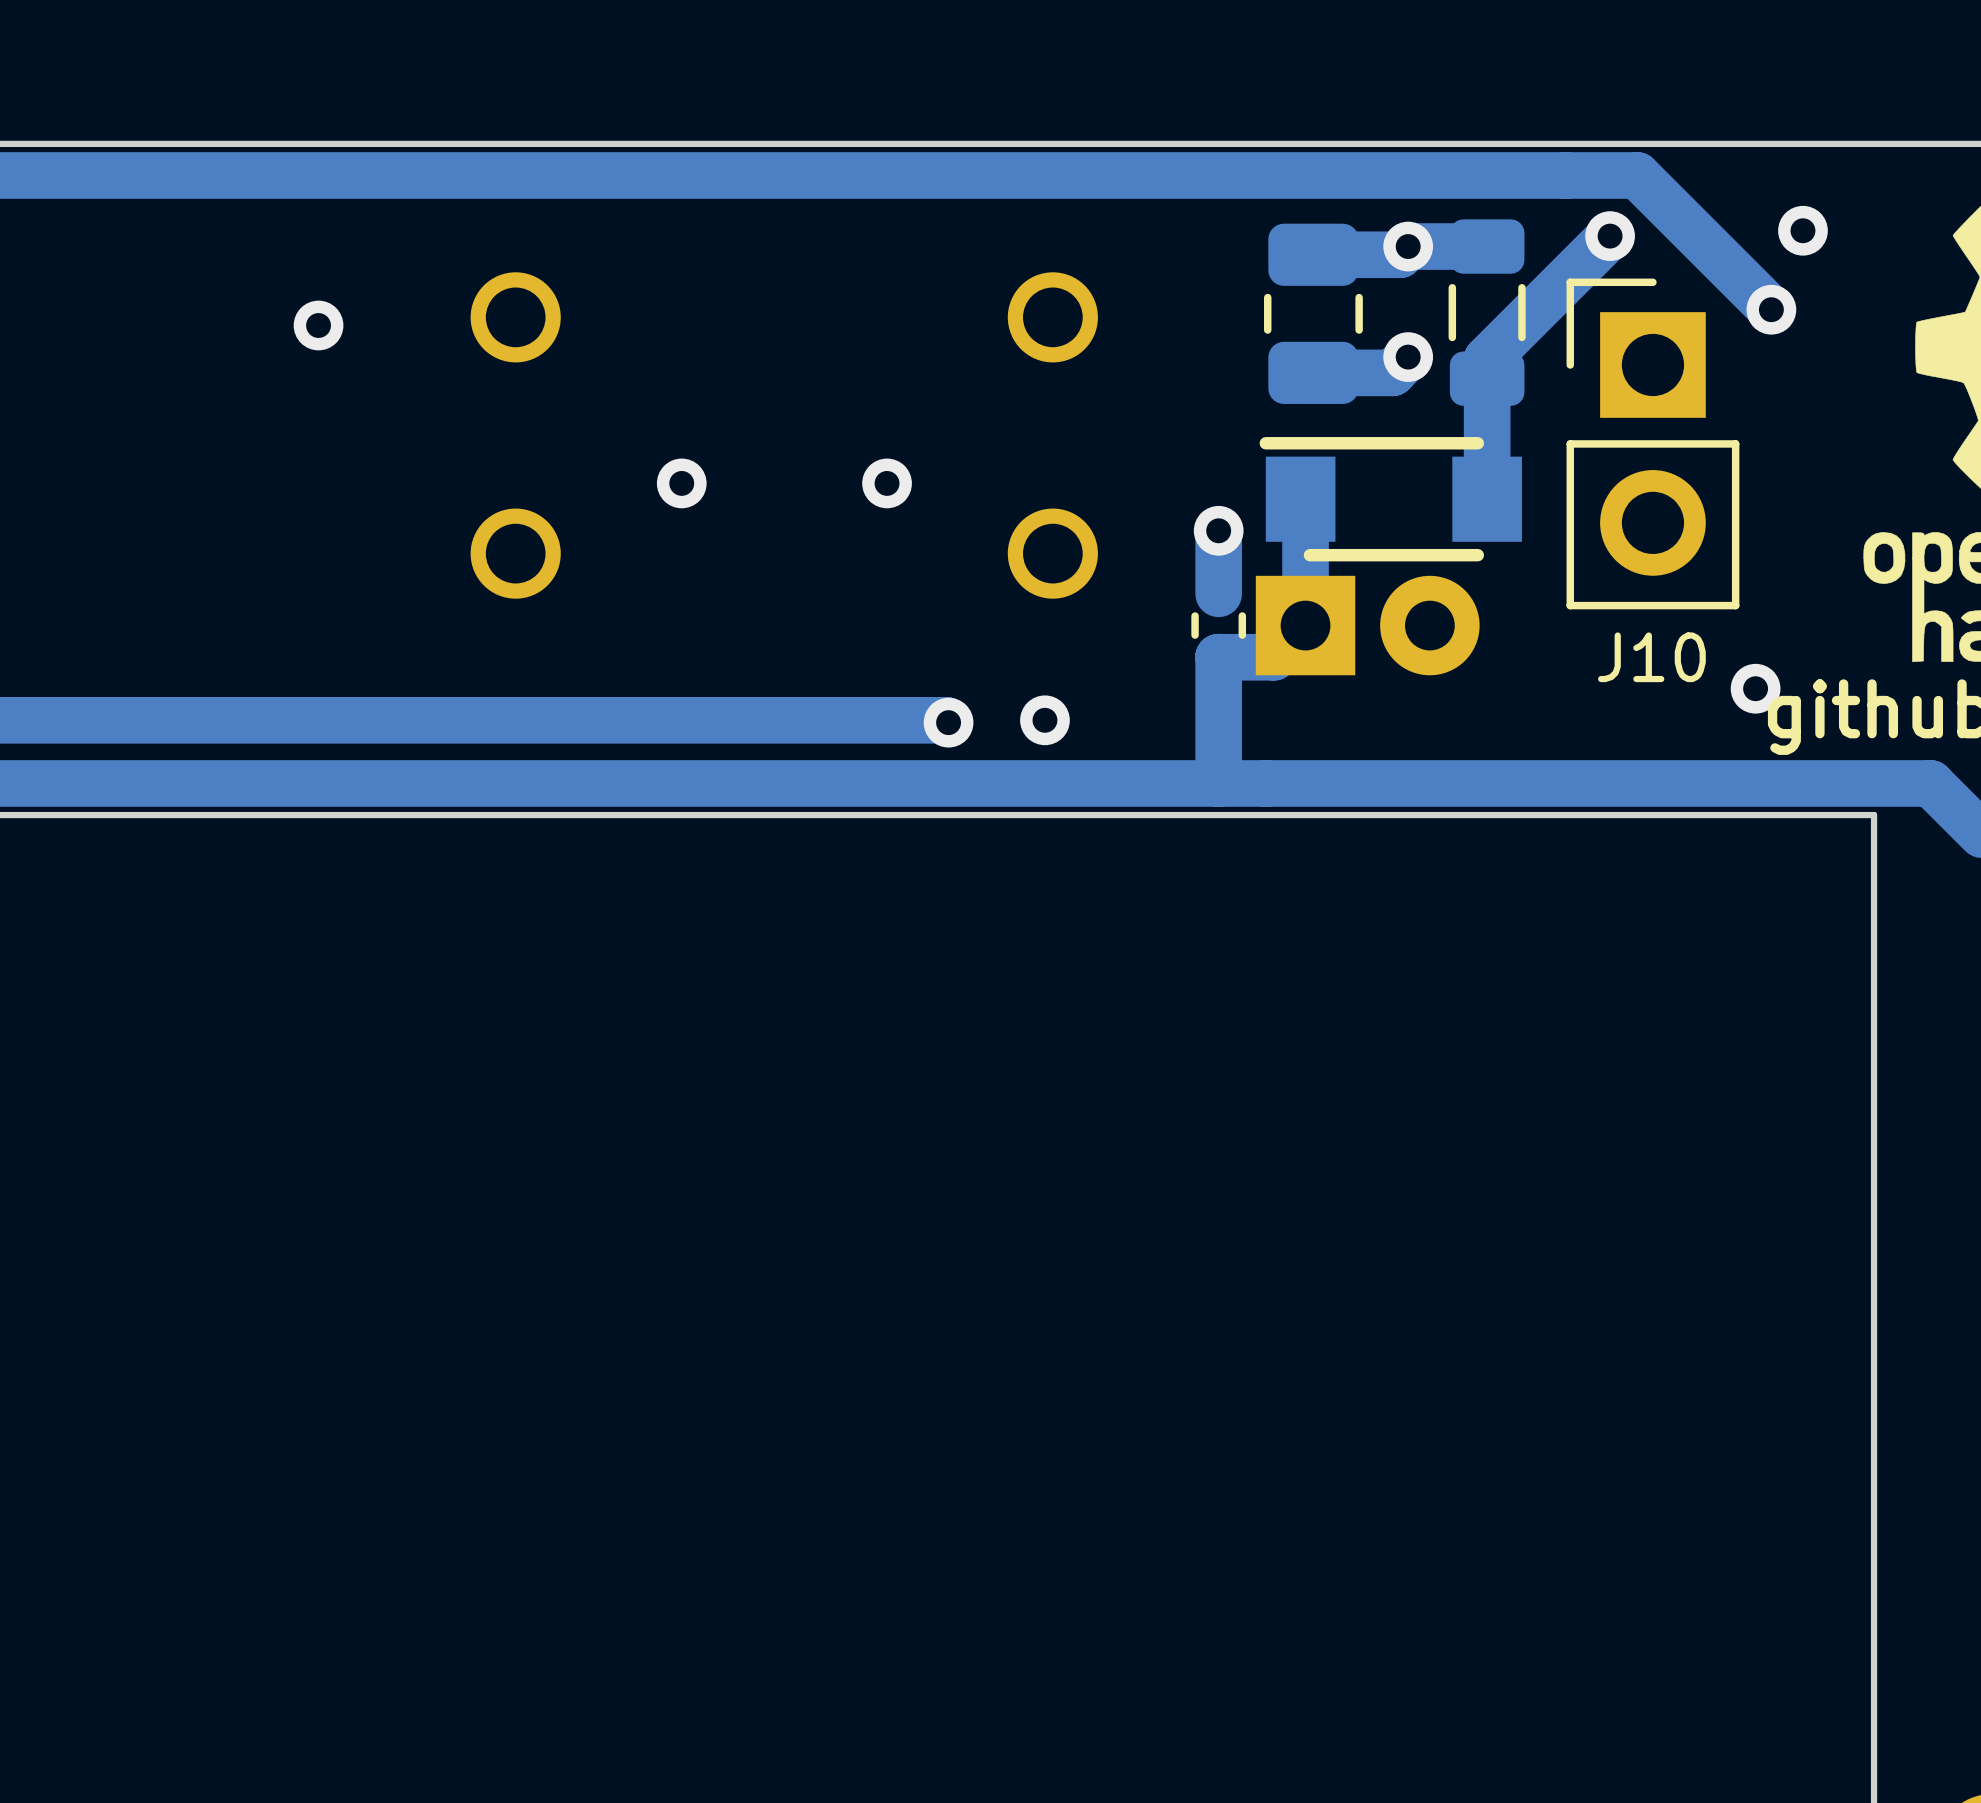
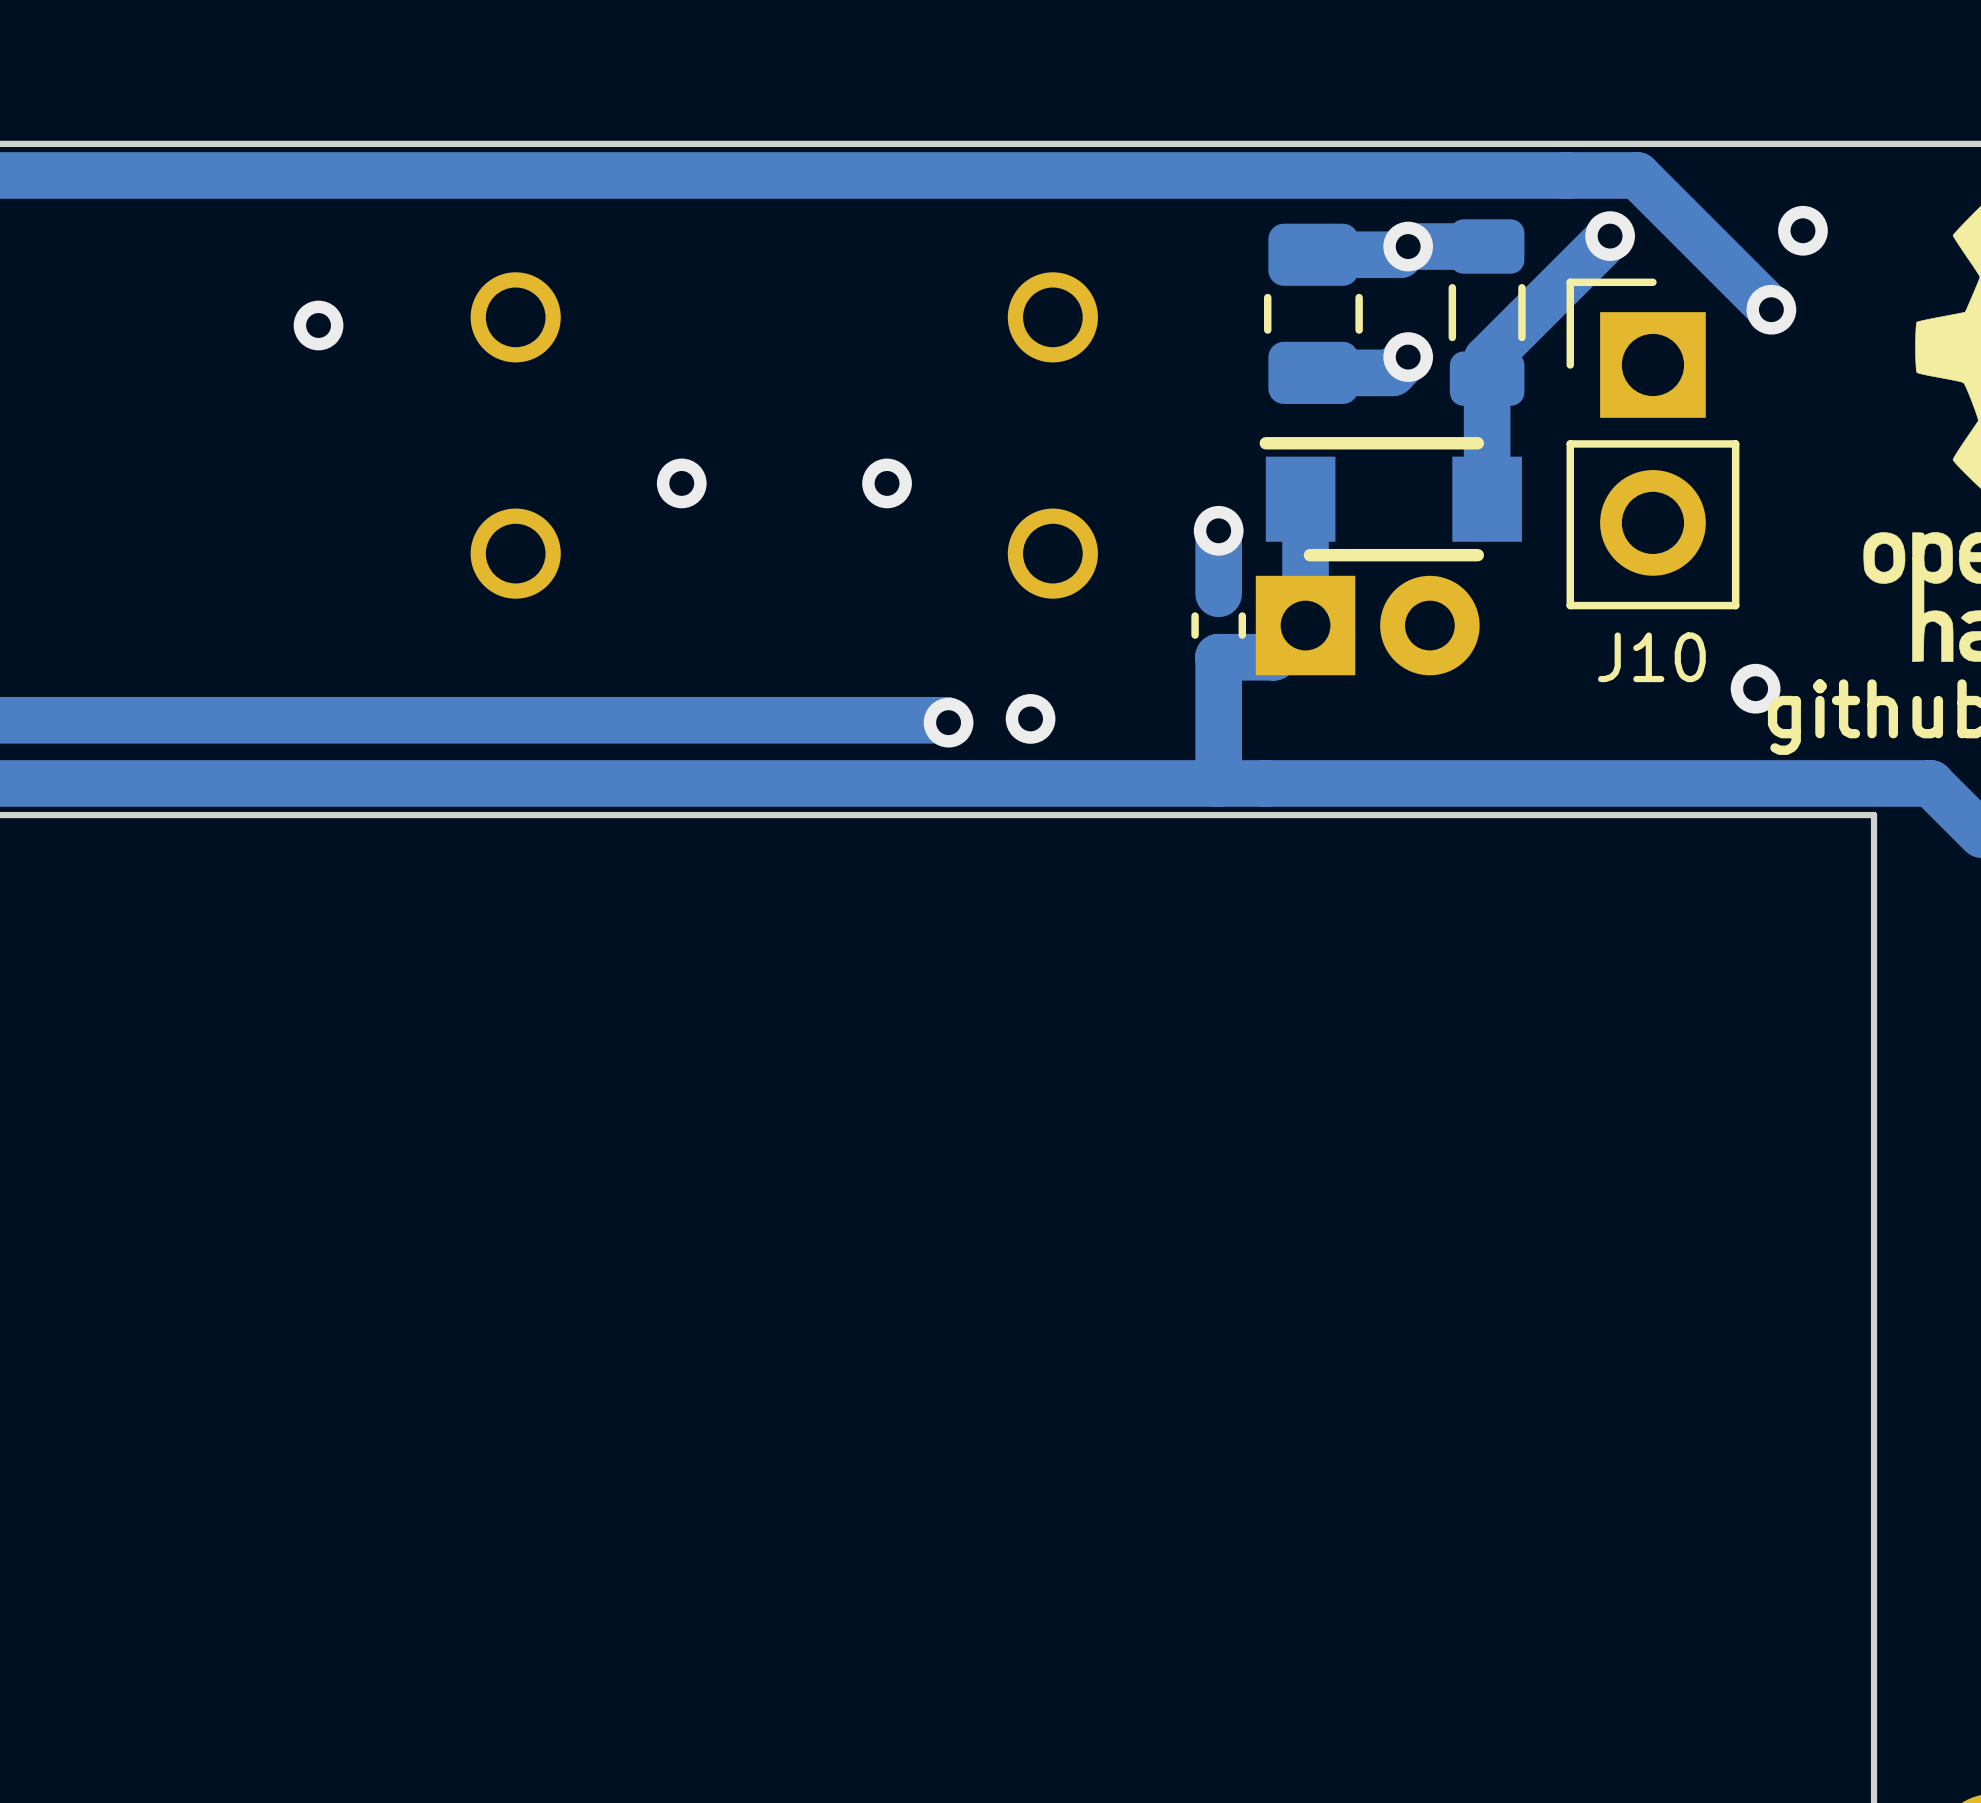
via position: (1044, 720) -> (1030, 718)

